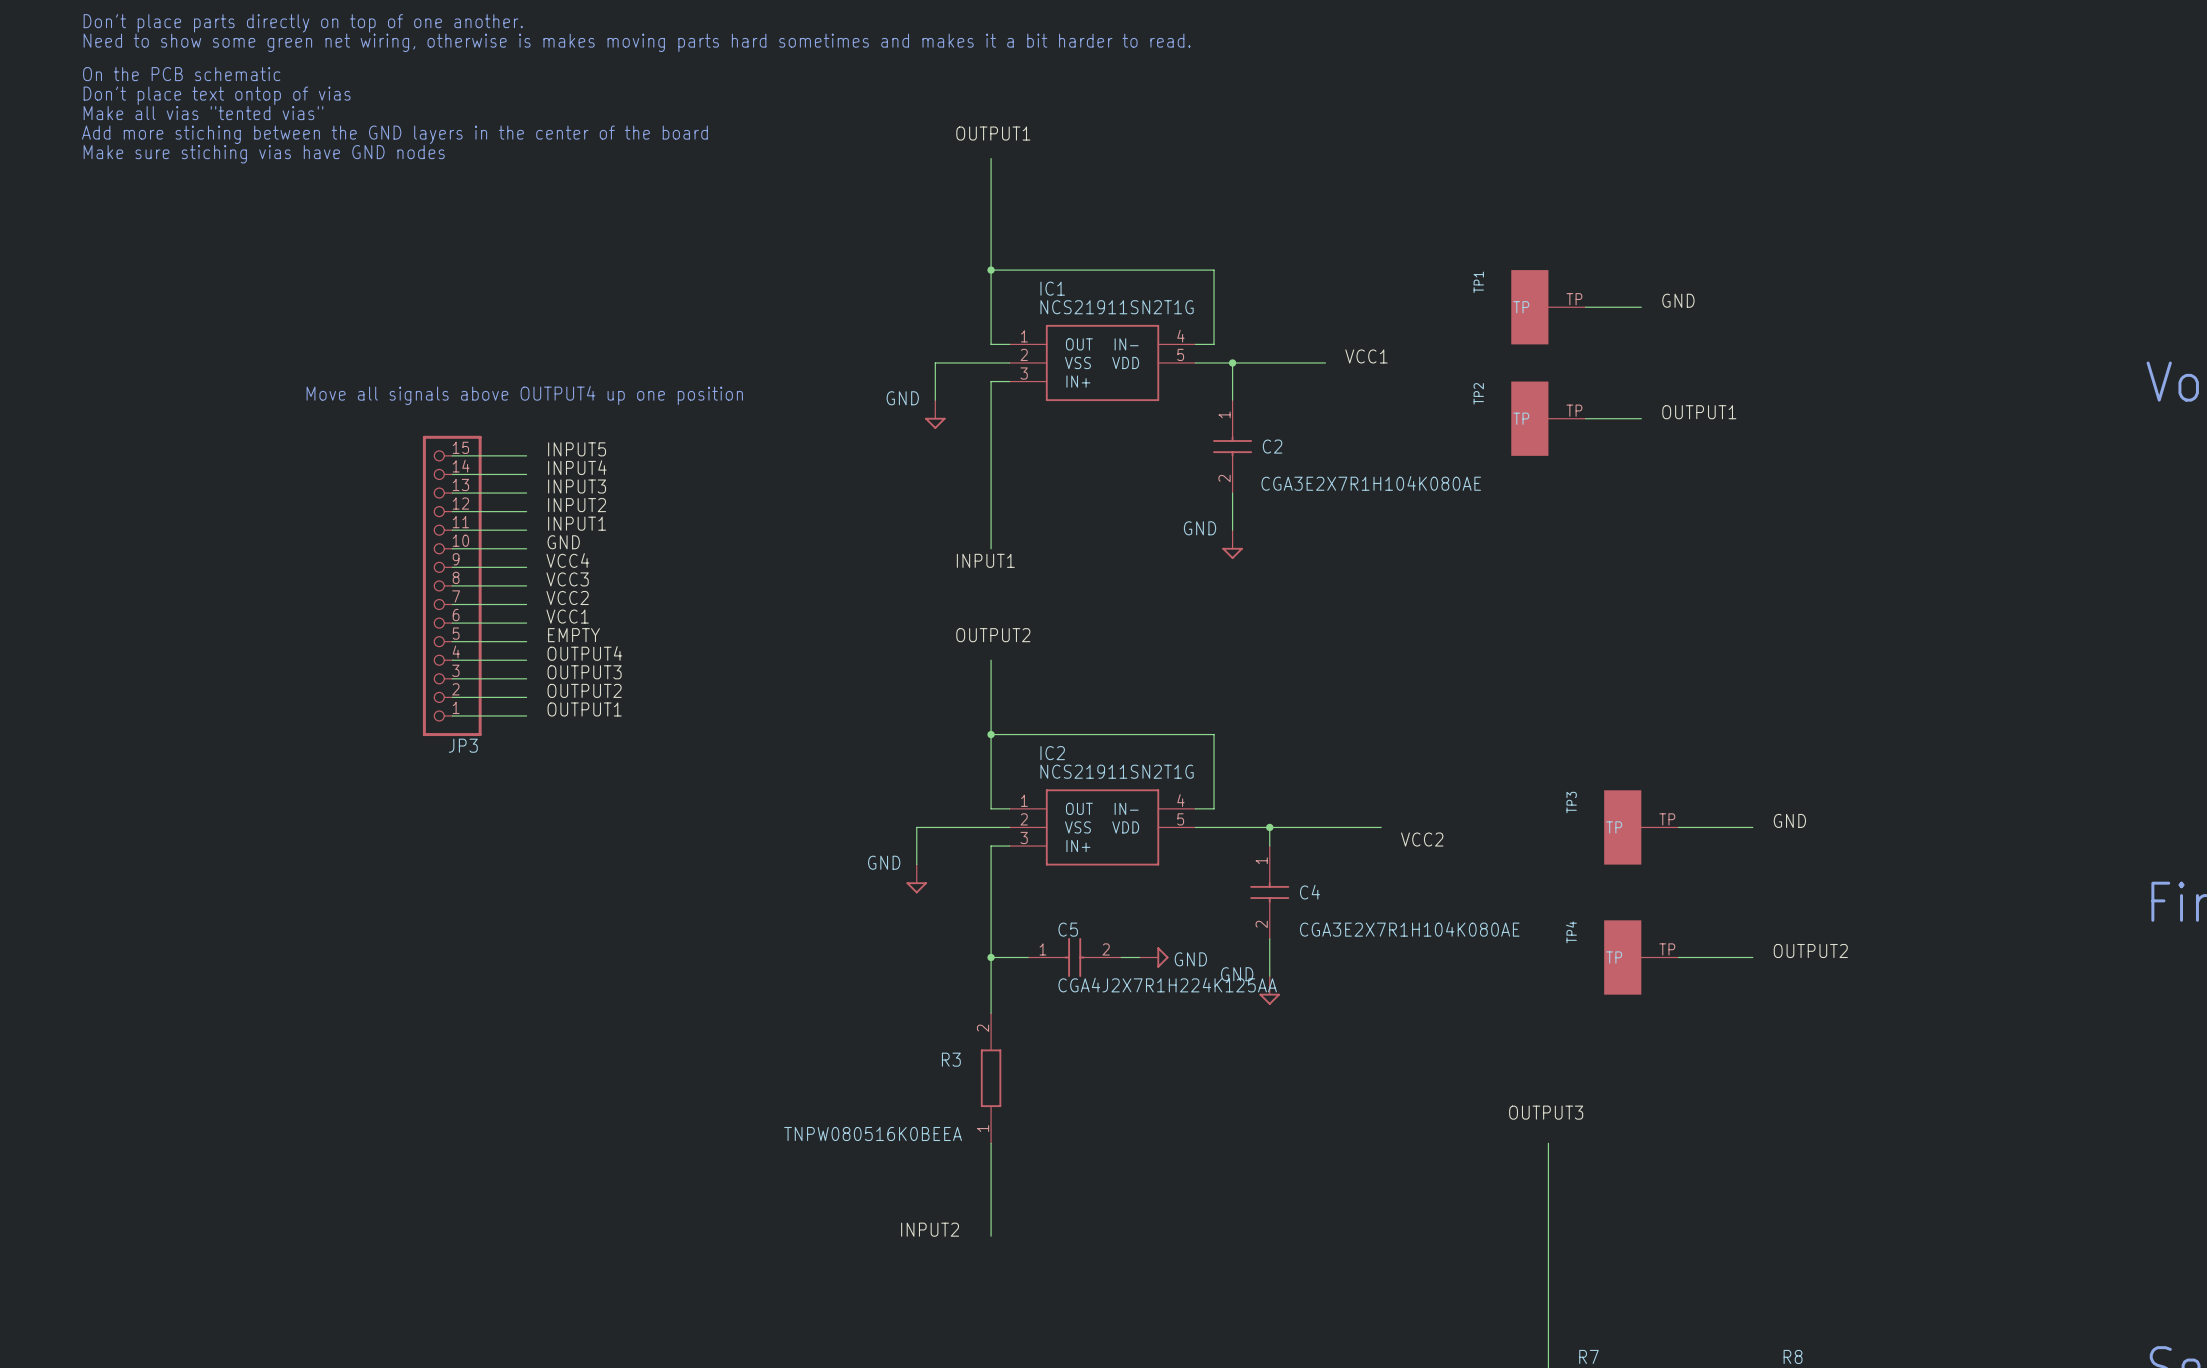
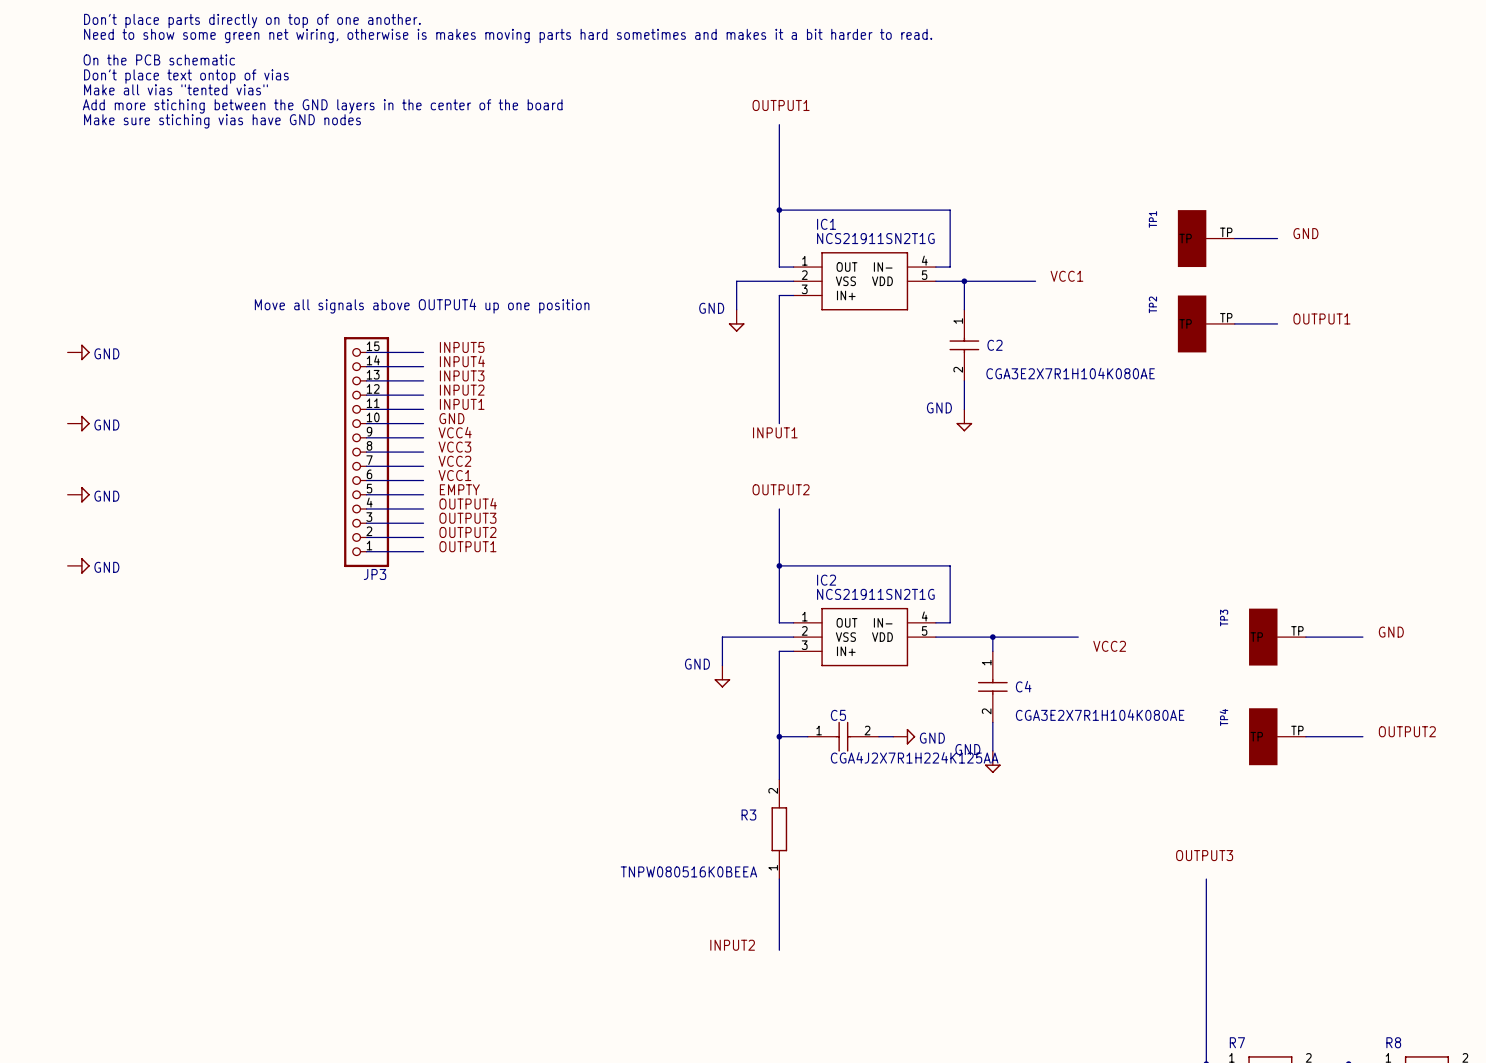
power symbol: none -> GND (78, 352)
power symbol: none -> GND (78, 423)
power symbol: none -> GND (78, 494)
power symbol: none -> GND (78, 565)

